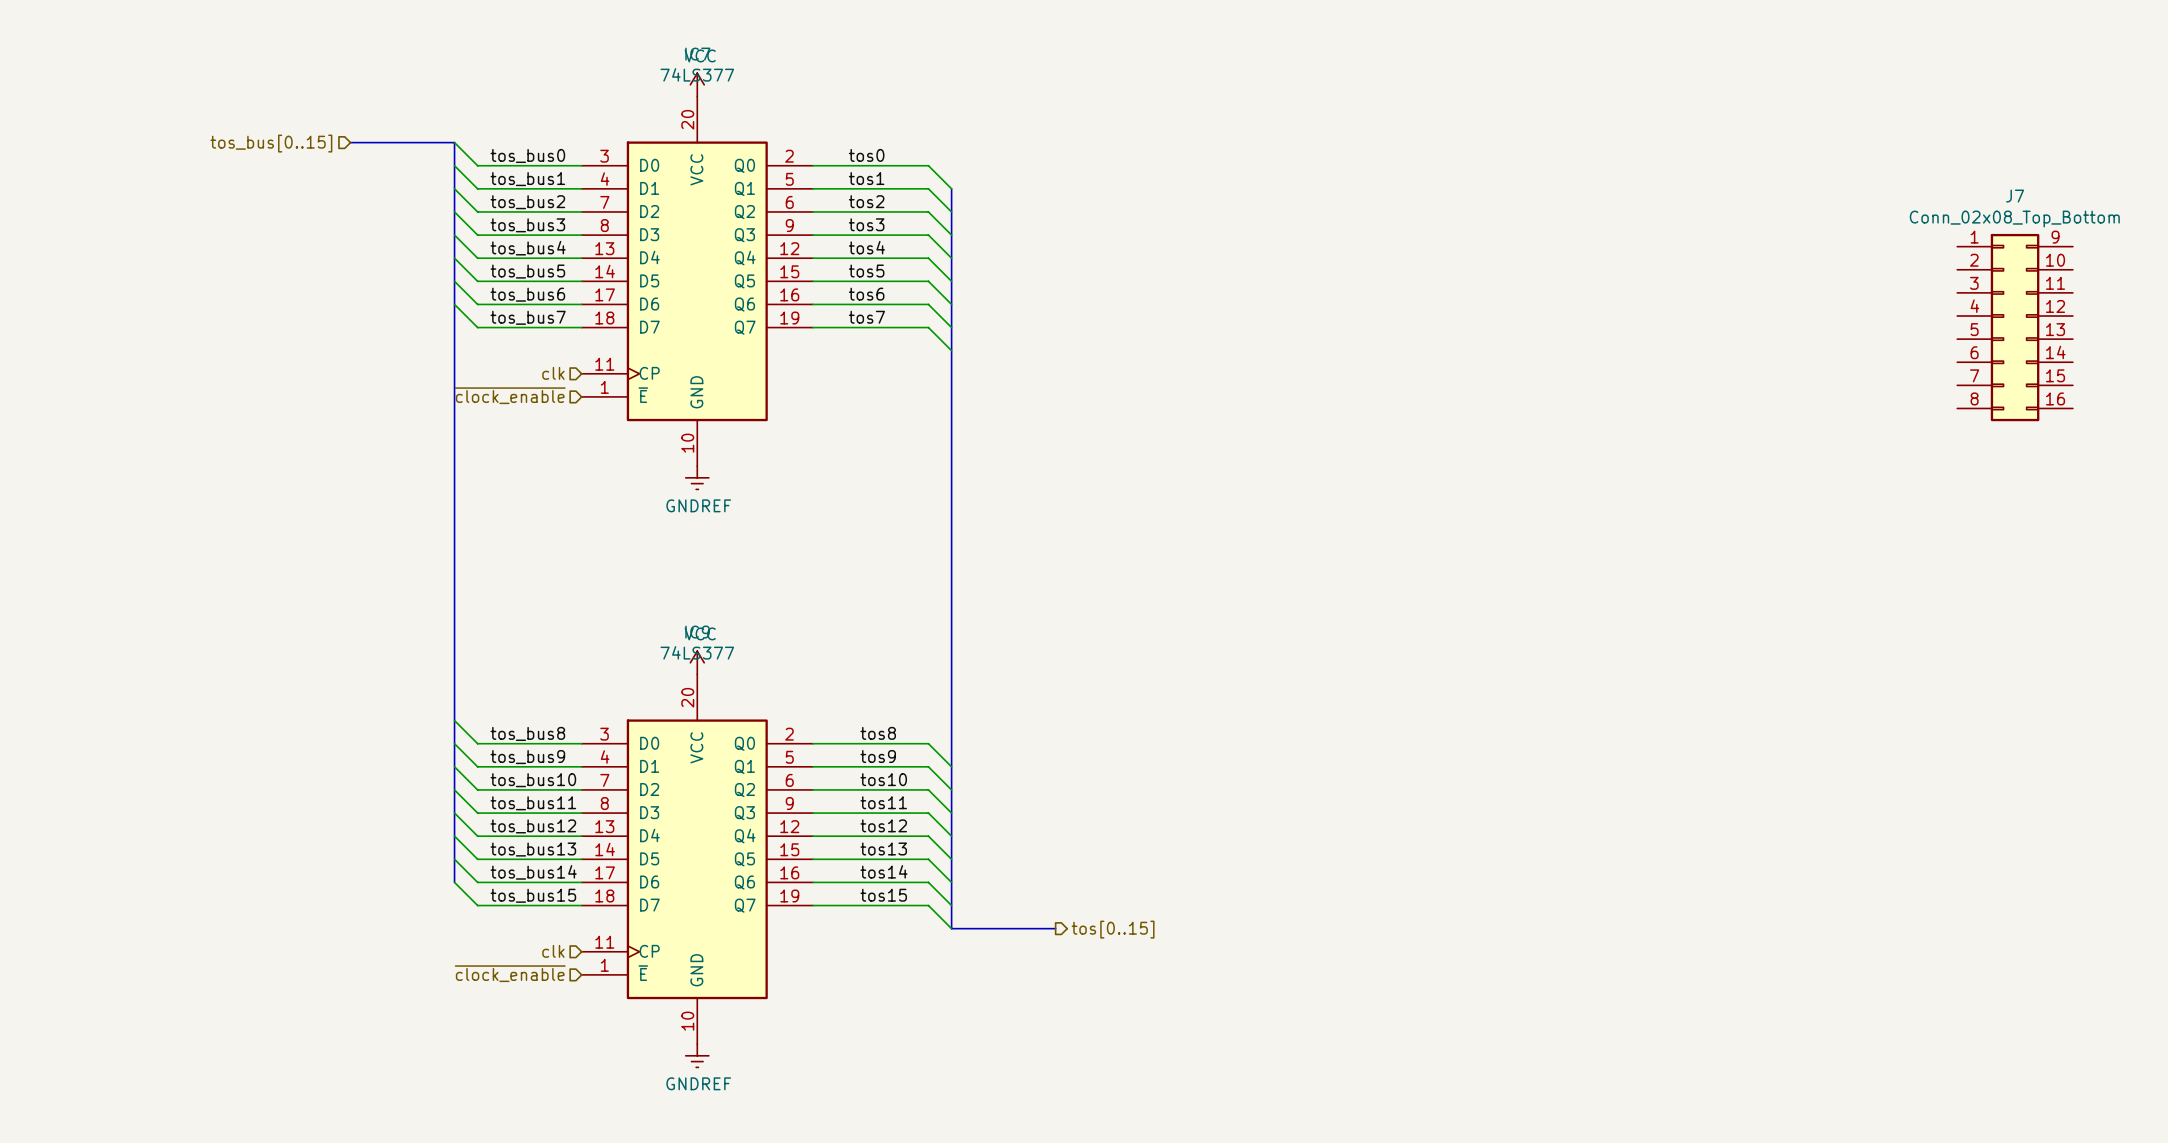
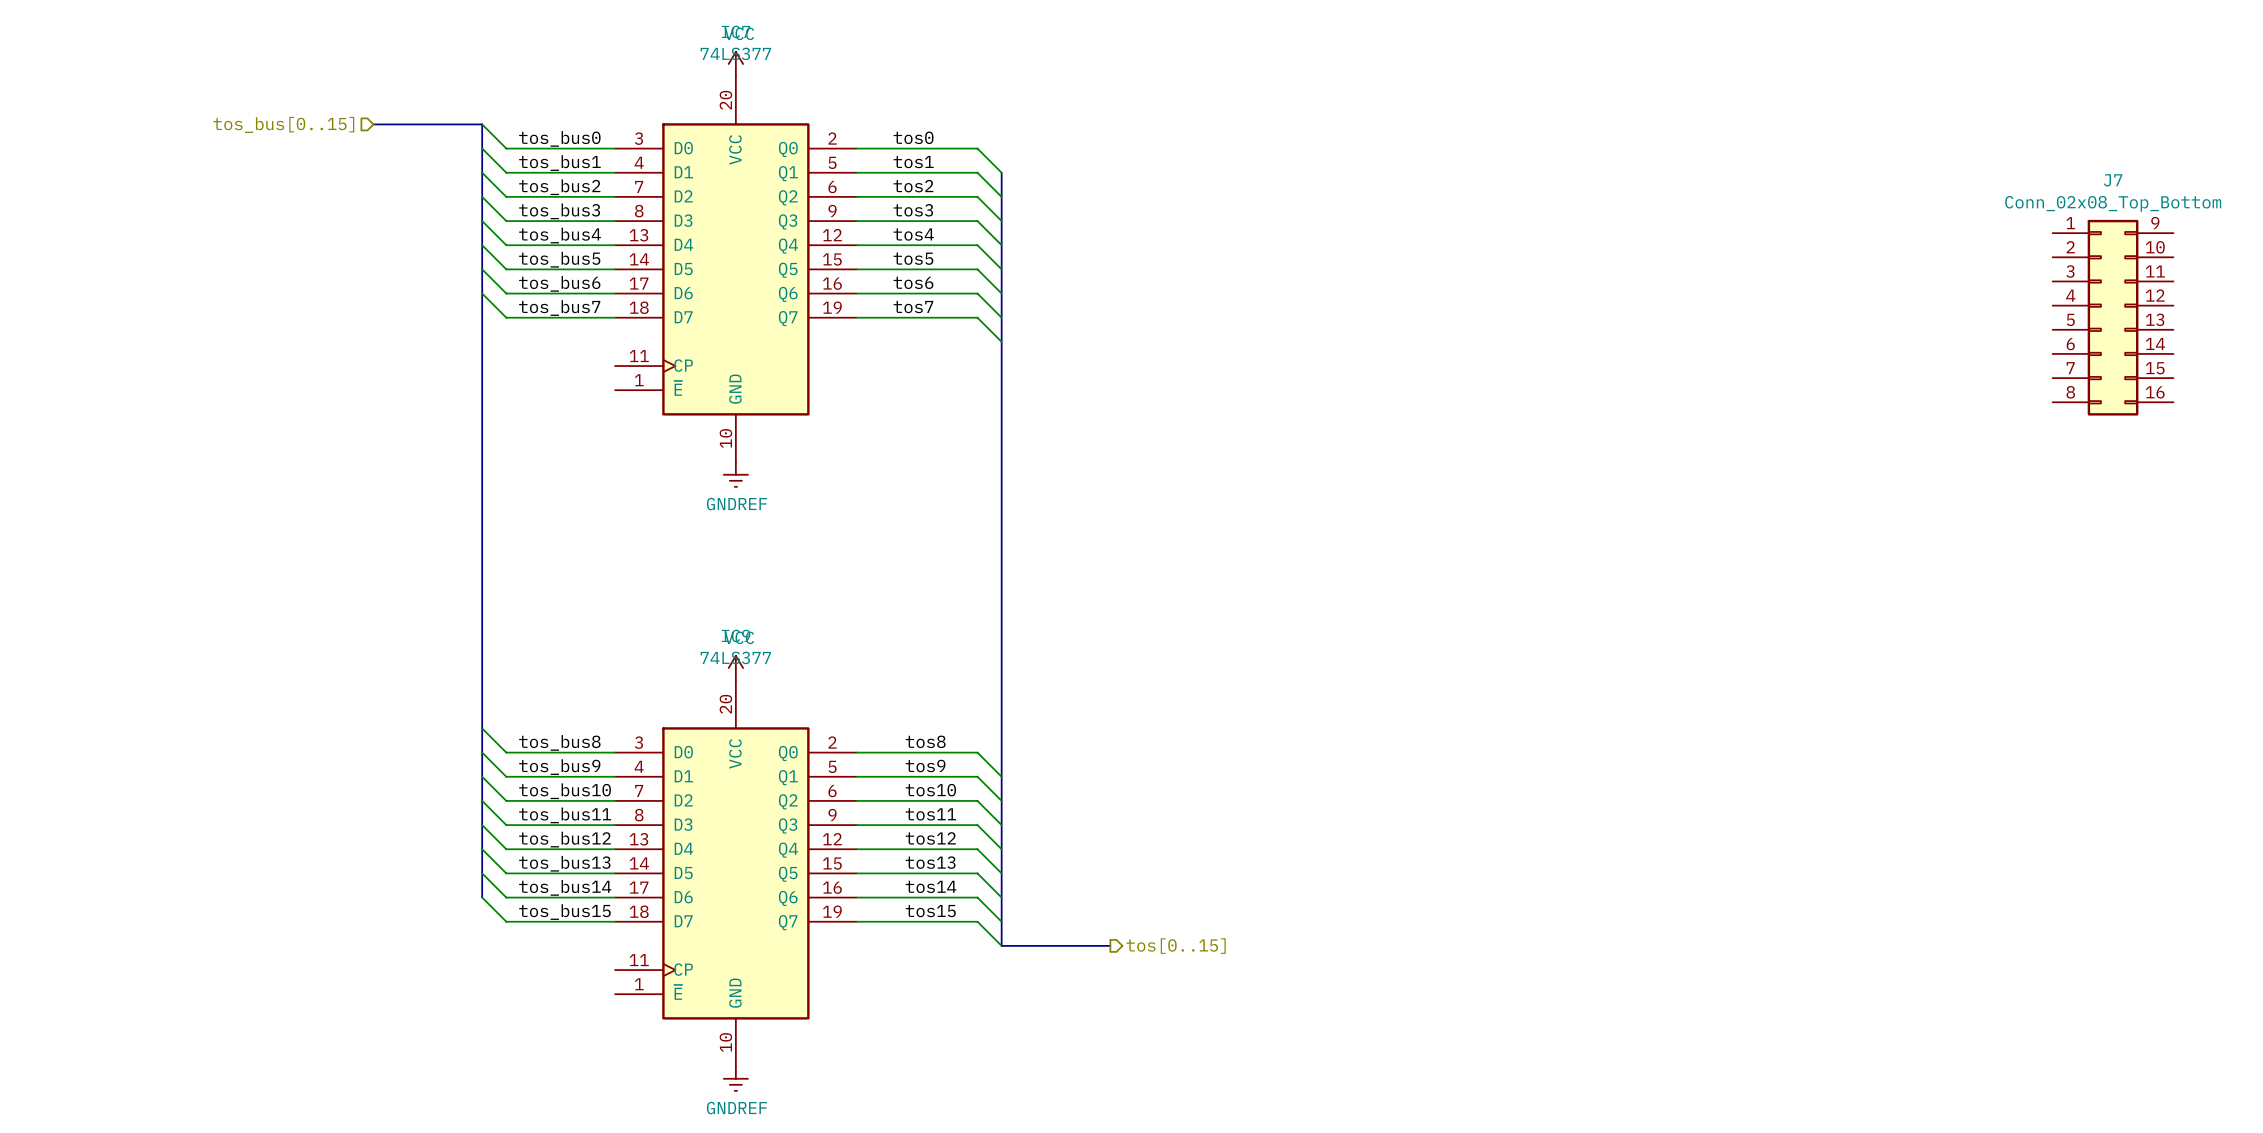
hierarchical label: clk (553, 373) -> none
hierarchical label: ~{clock_enable} (510, 395) -> none
hierarchical label: clk (553, 951) -> none
hierarchical label: ~{clock_enable} (510, 973) -> none

